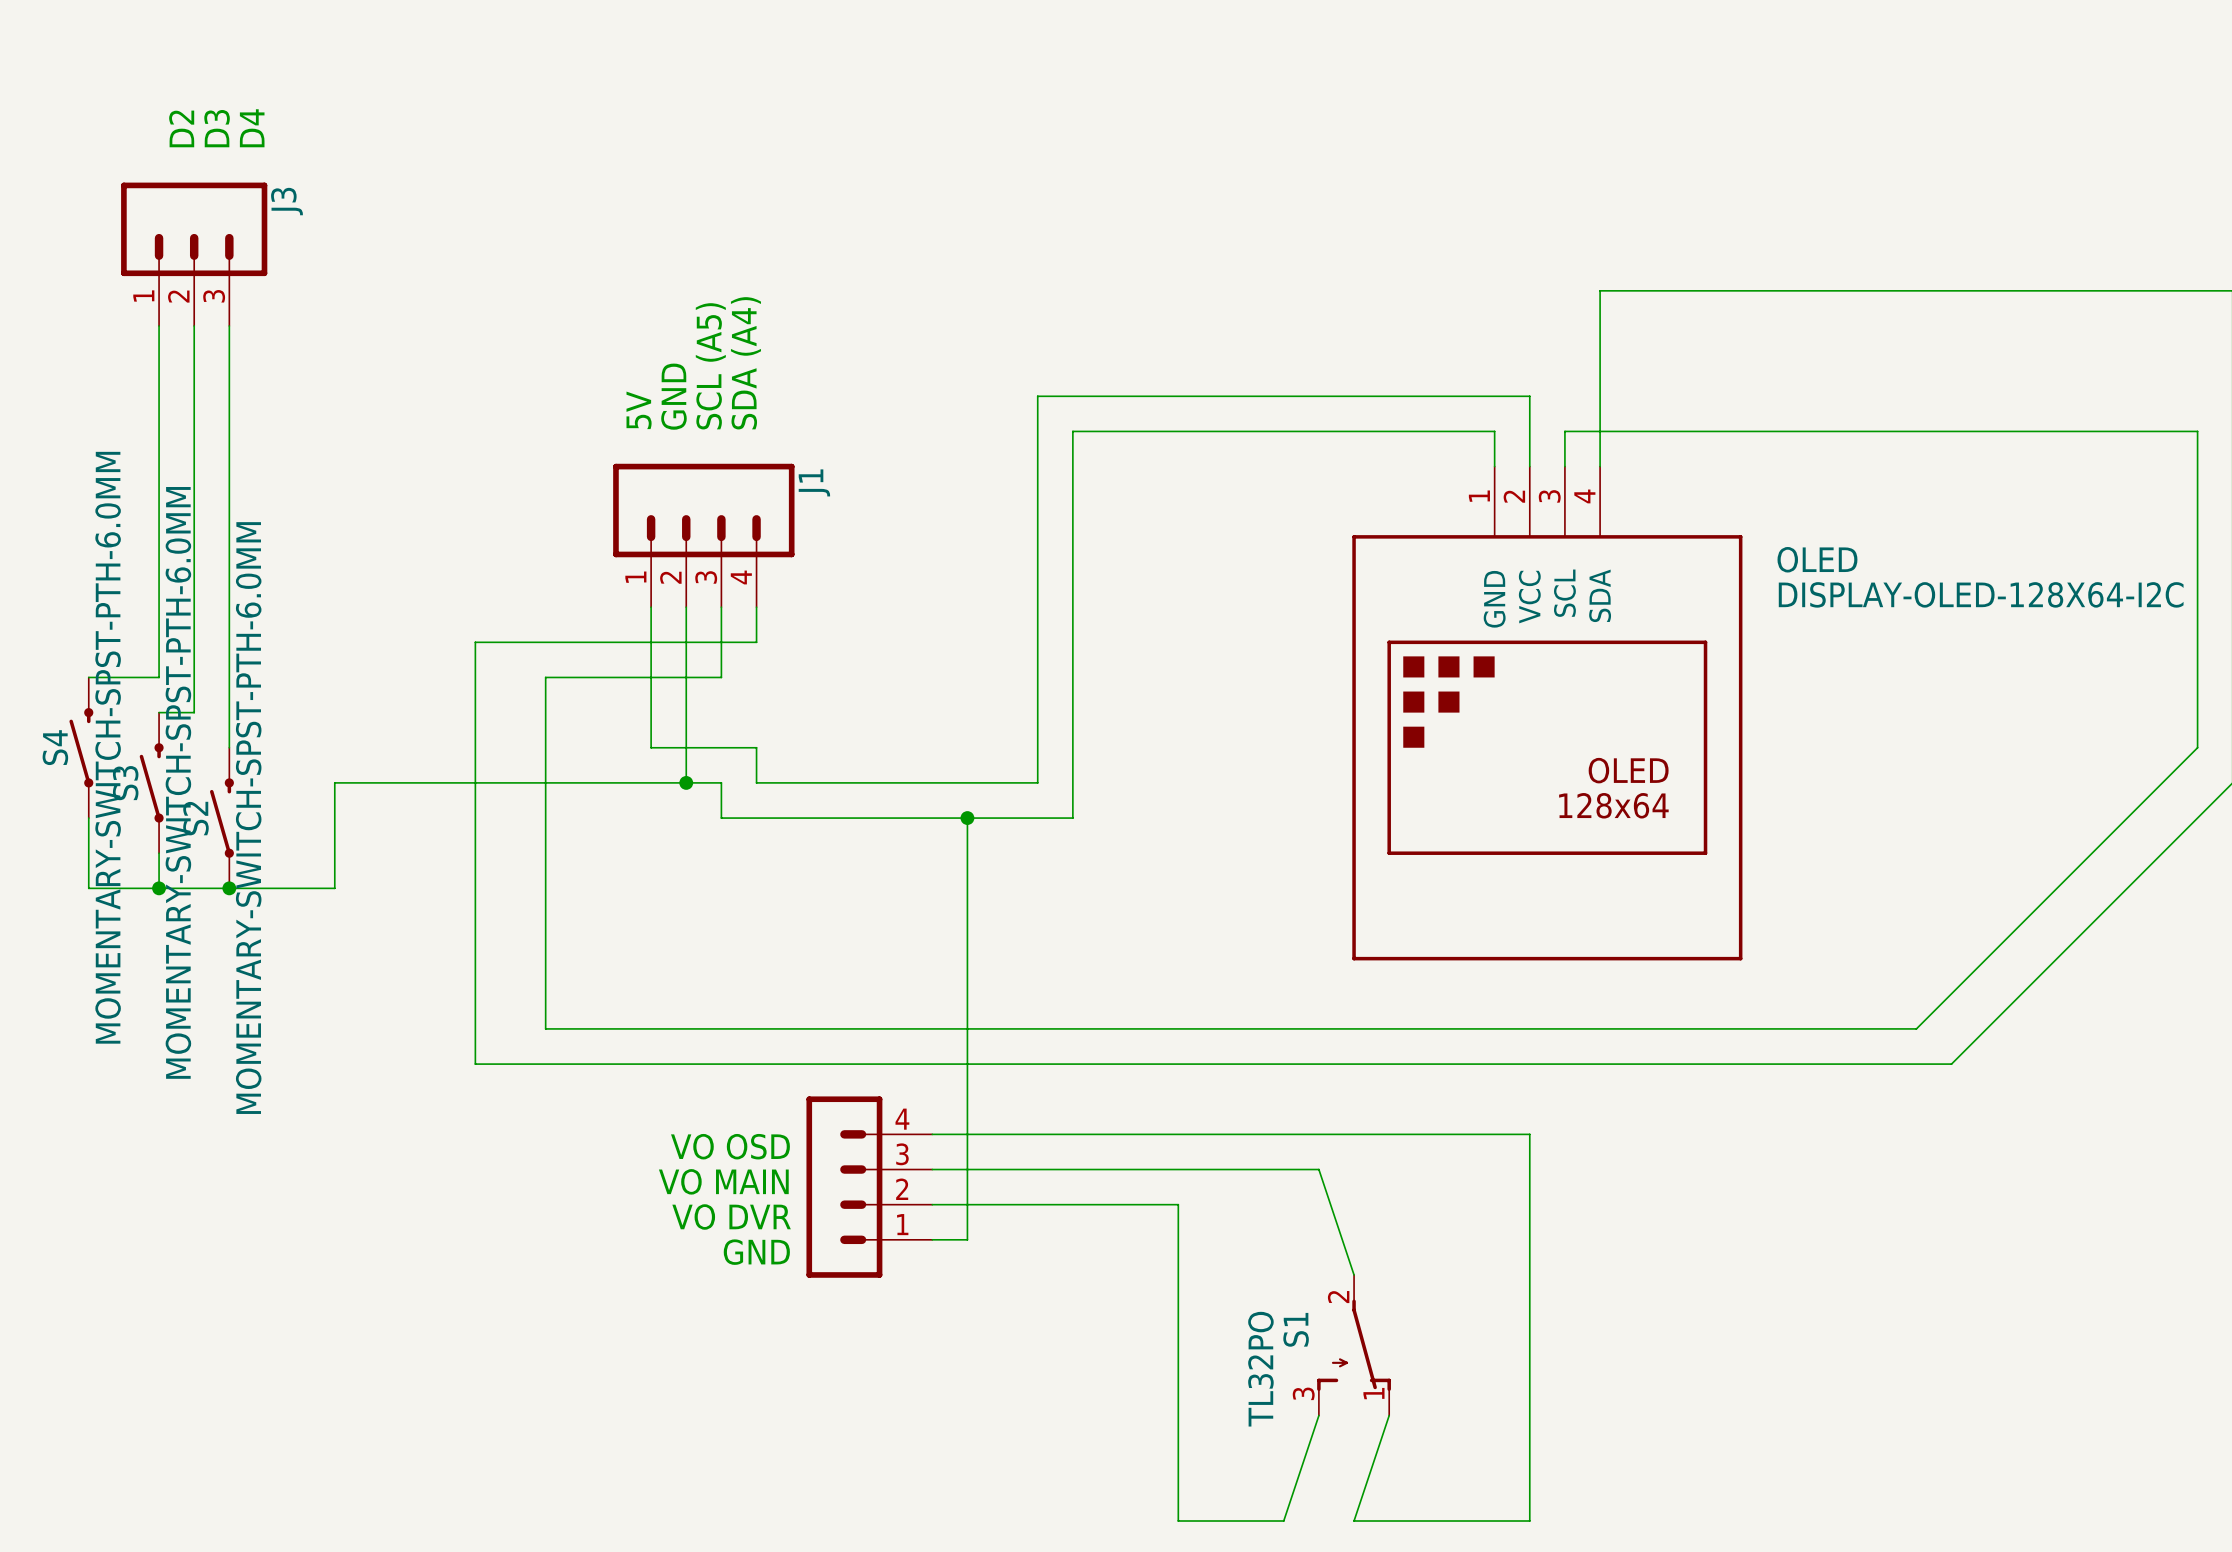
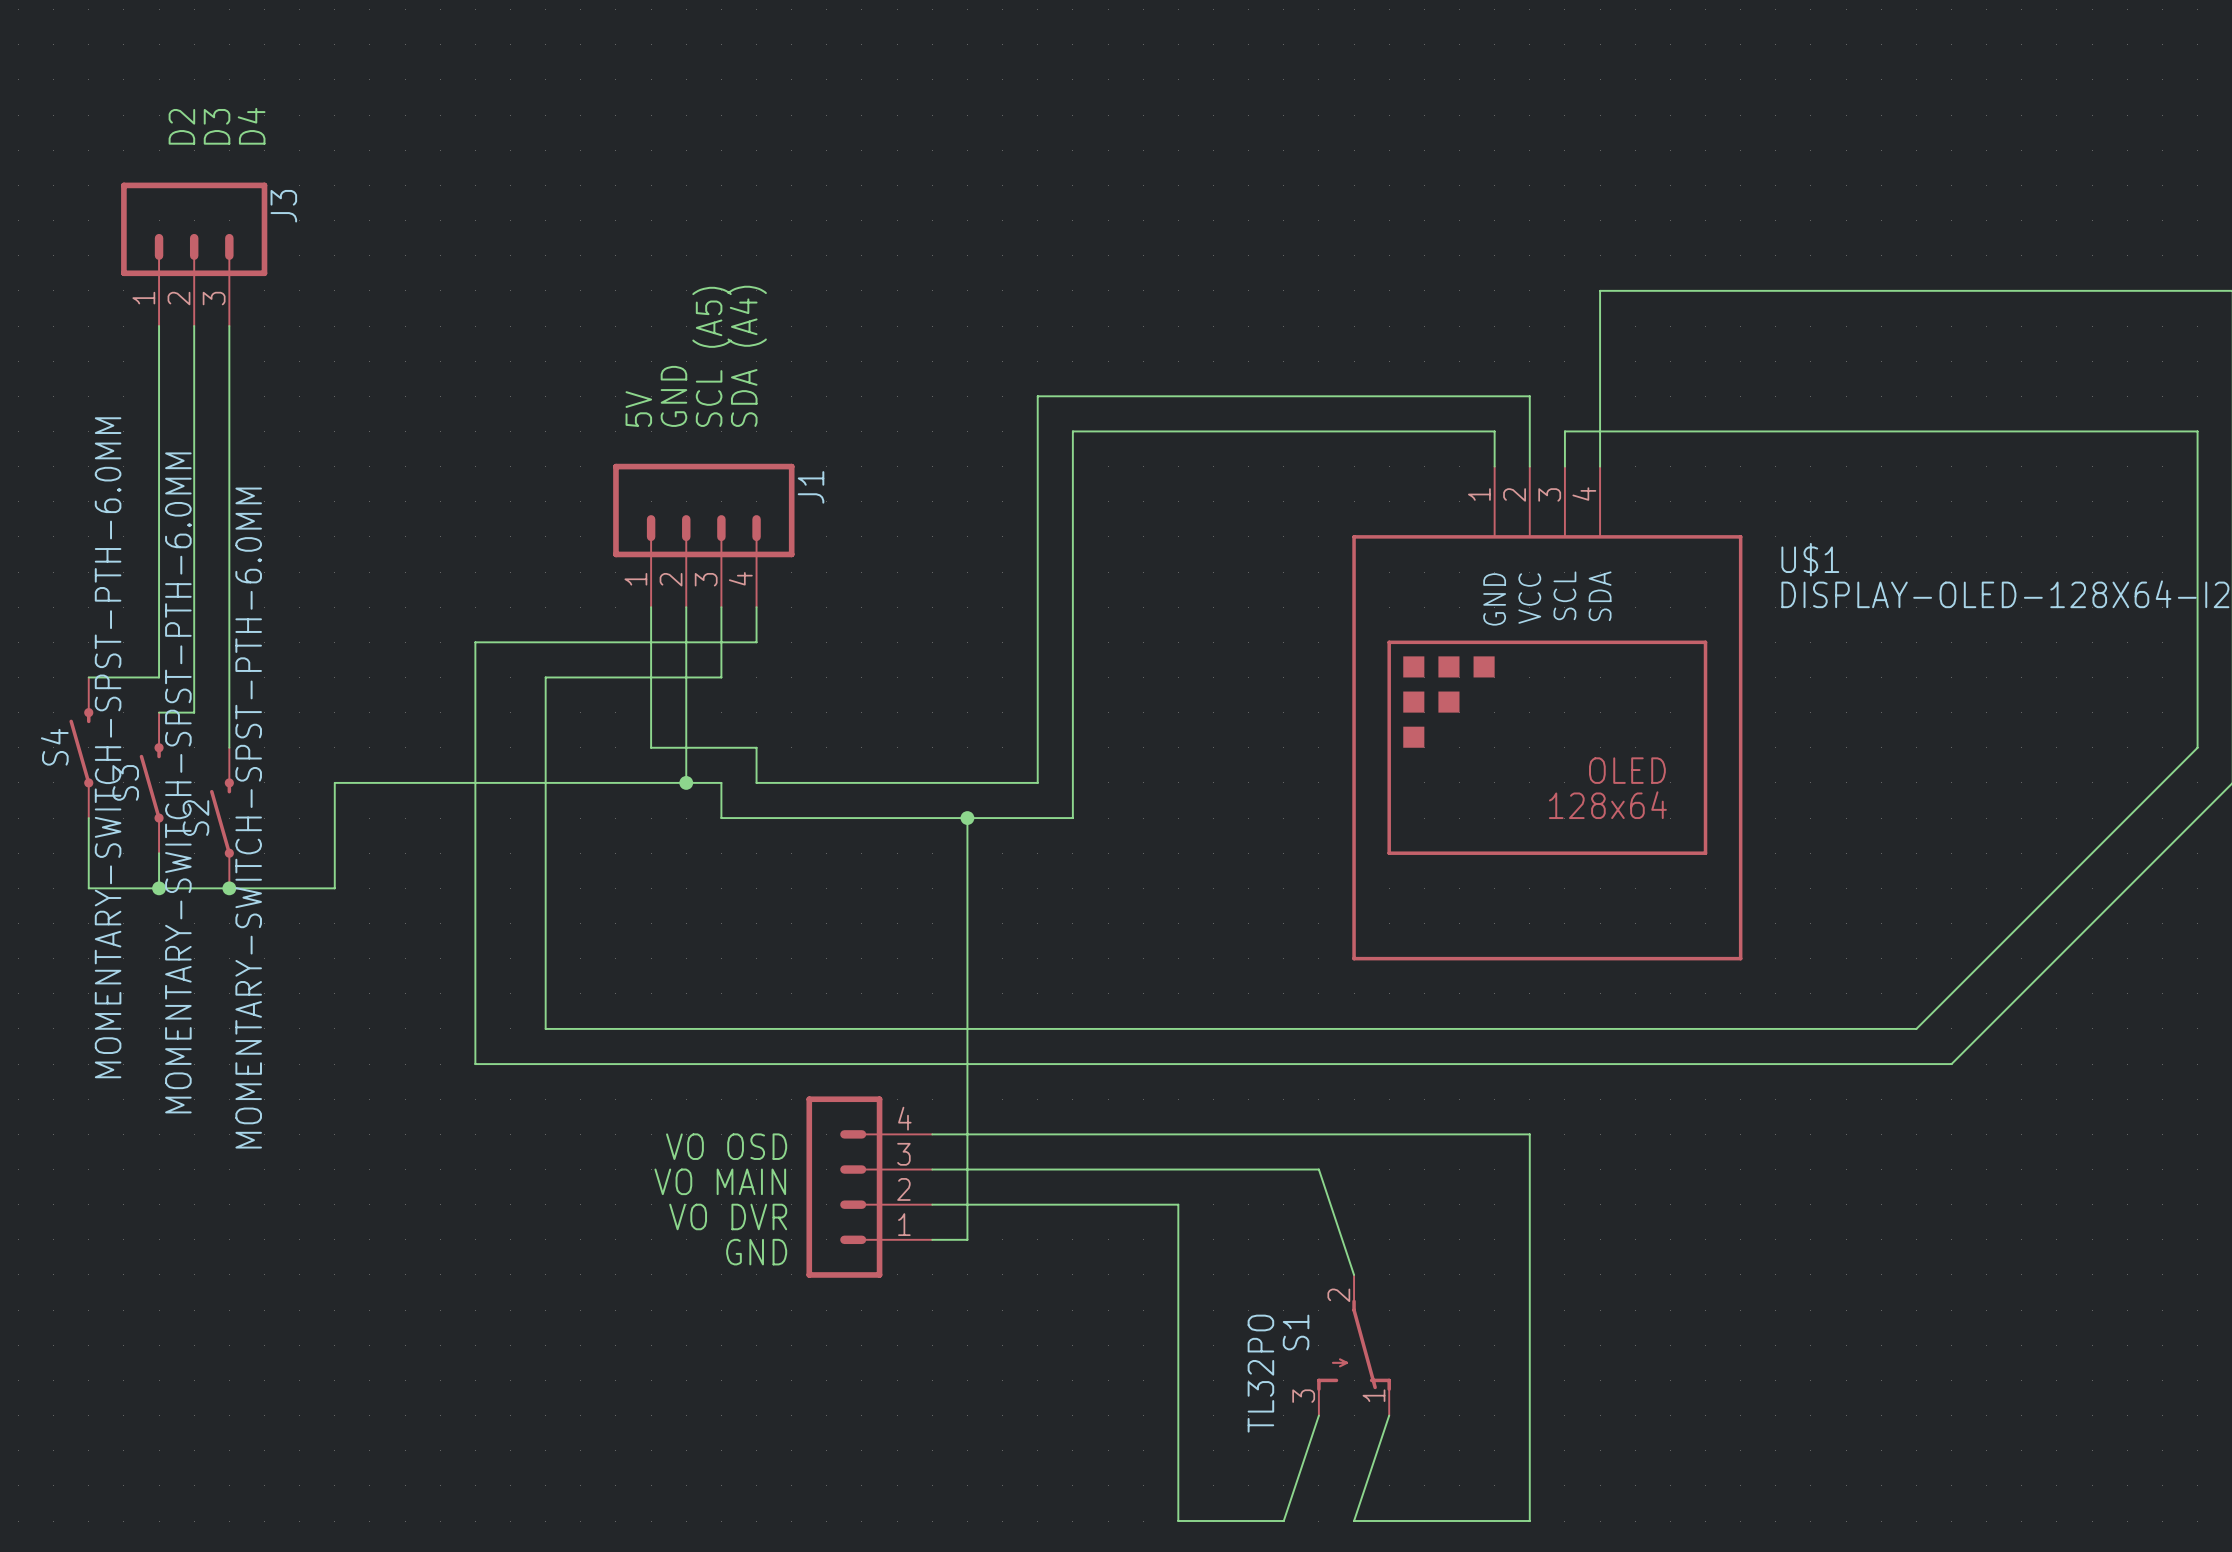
OLED name: OLED (1817, 559) -> U$1 (1810, 559)

